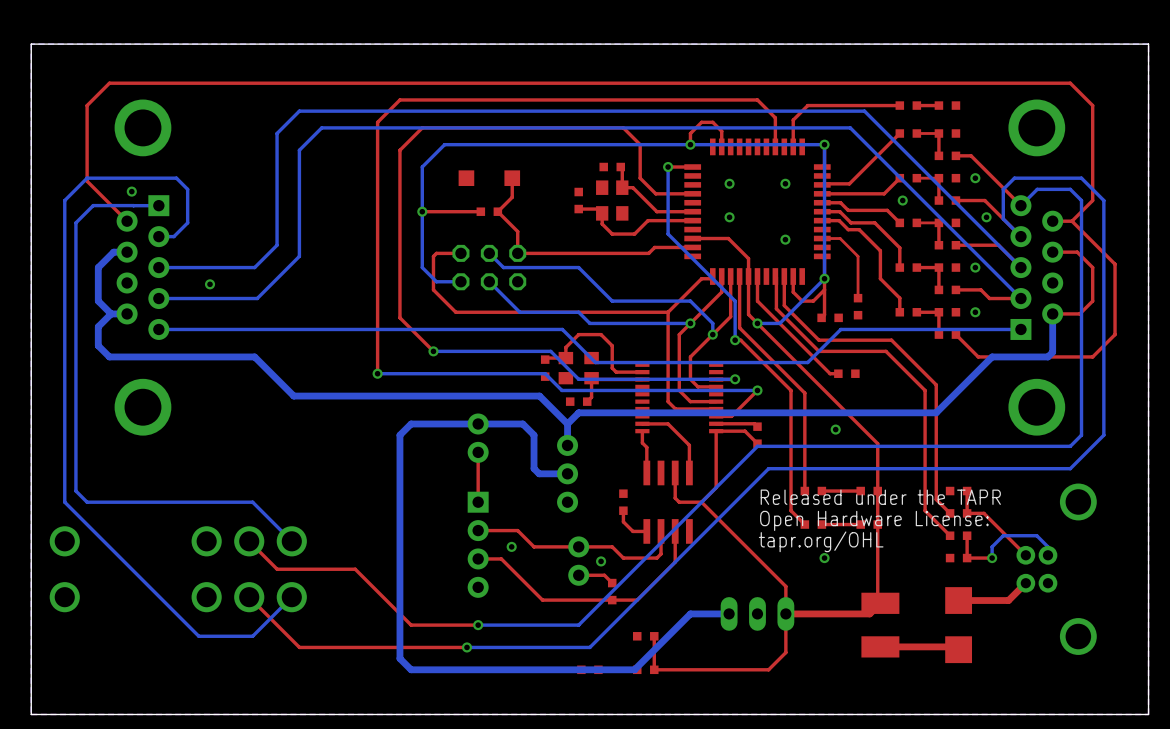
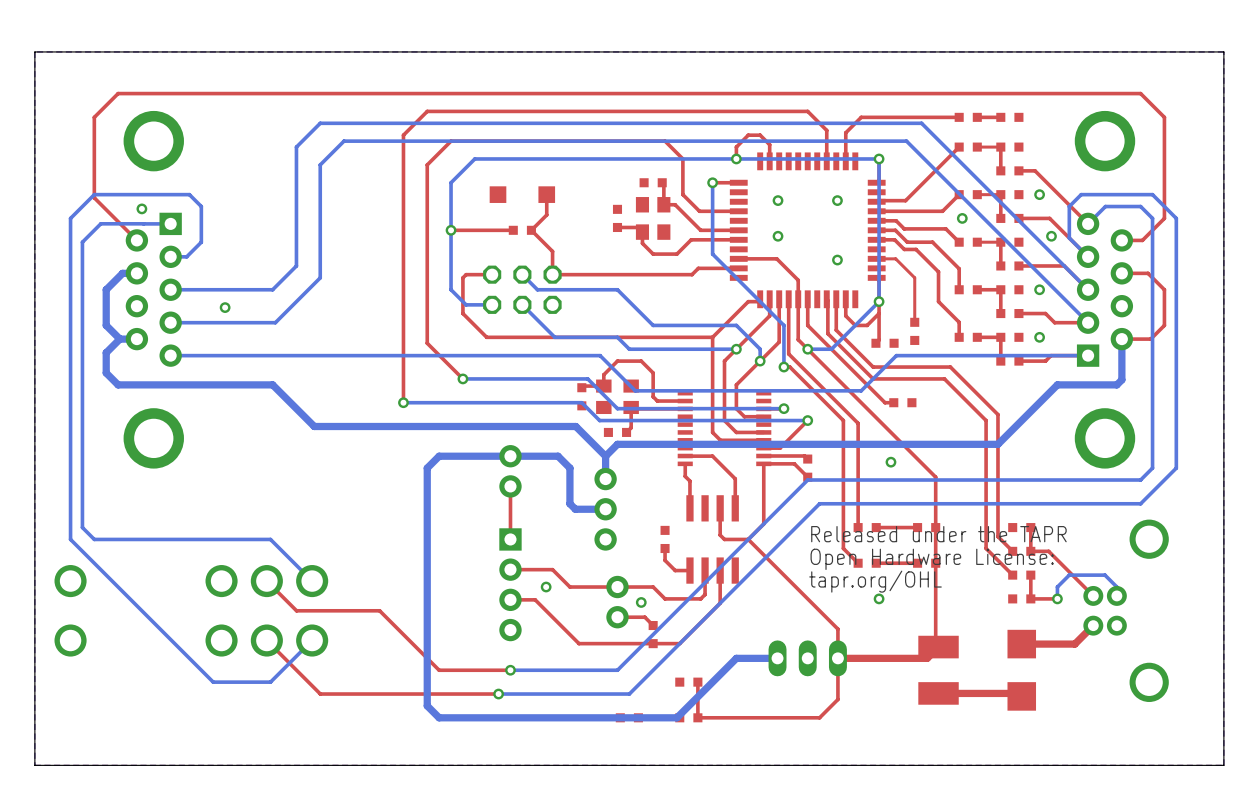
top track: (1072, 221) (1115, 264) (1115, 334) (1092, 356) (978, 356) (955, 334) -> (1088, 355) (1051, 355) (1045, 361) (1018, 361)

